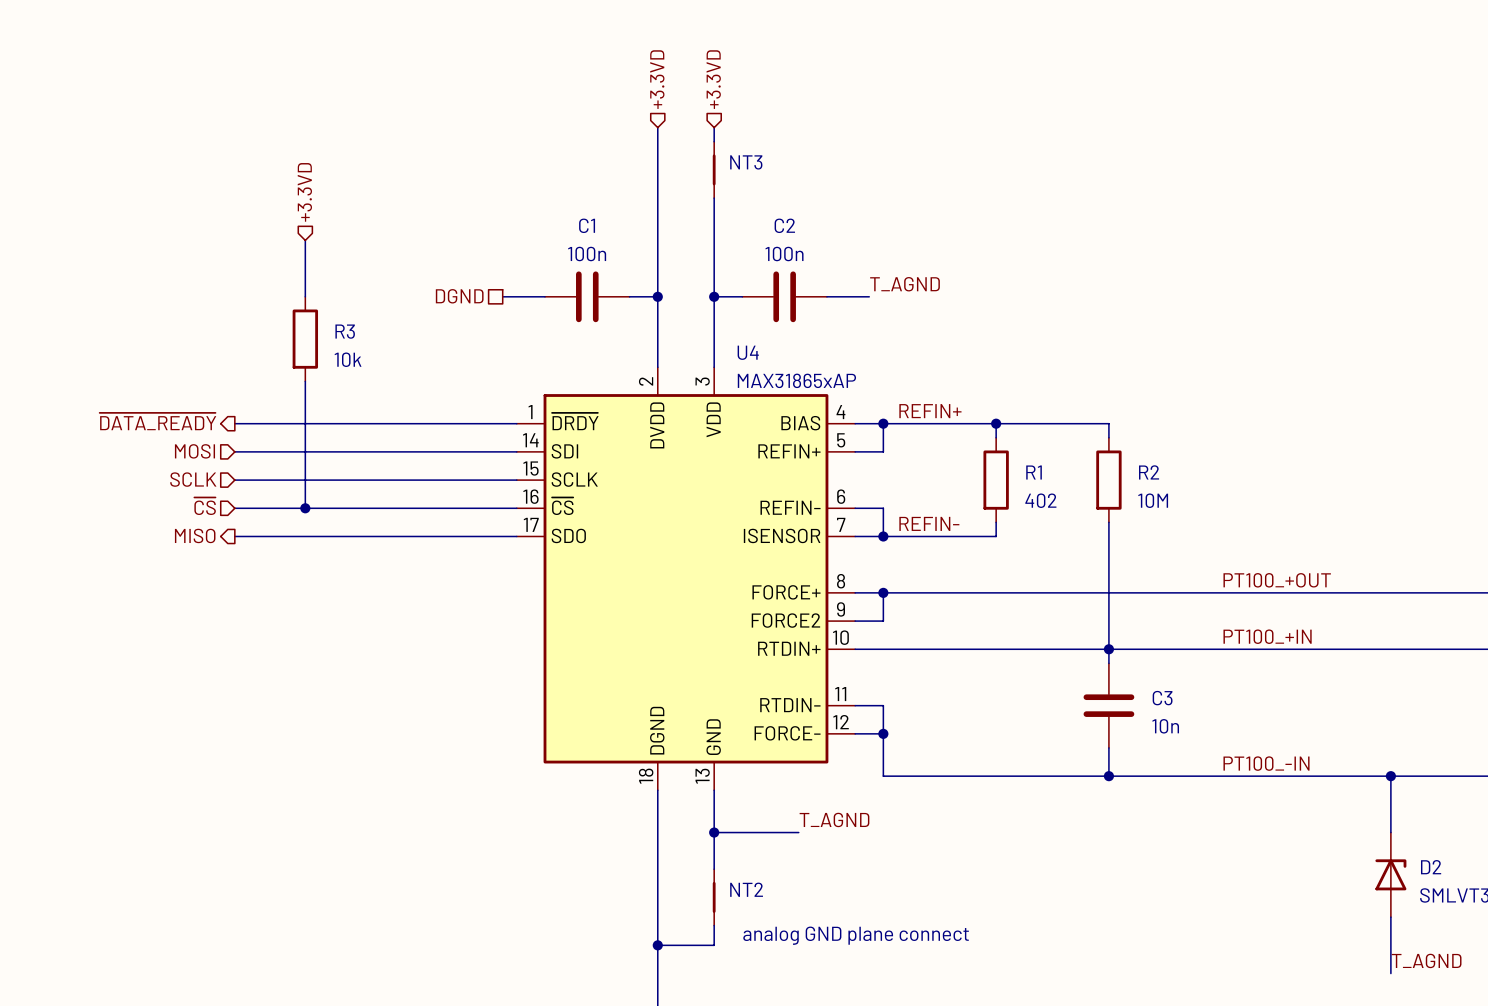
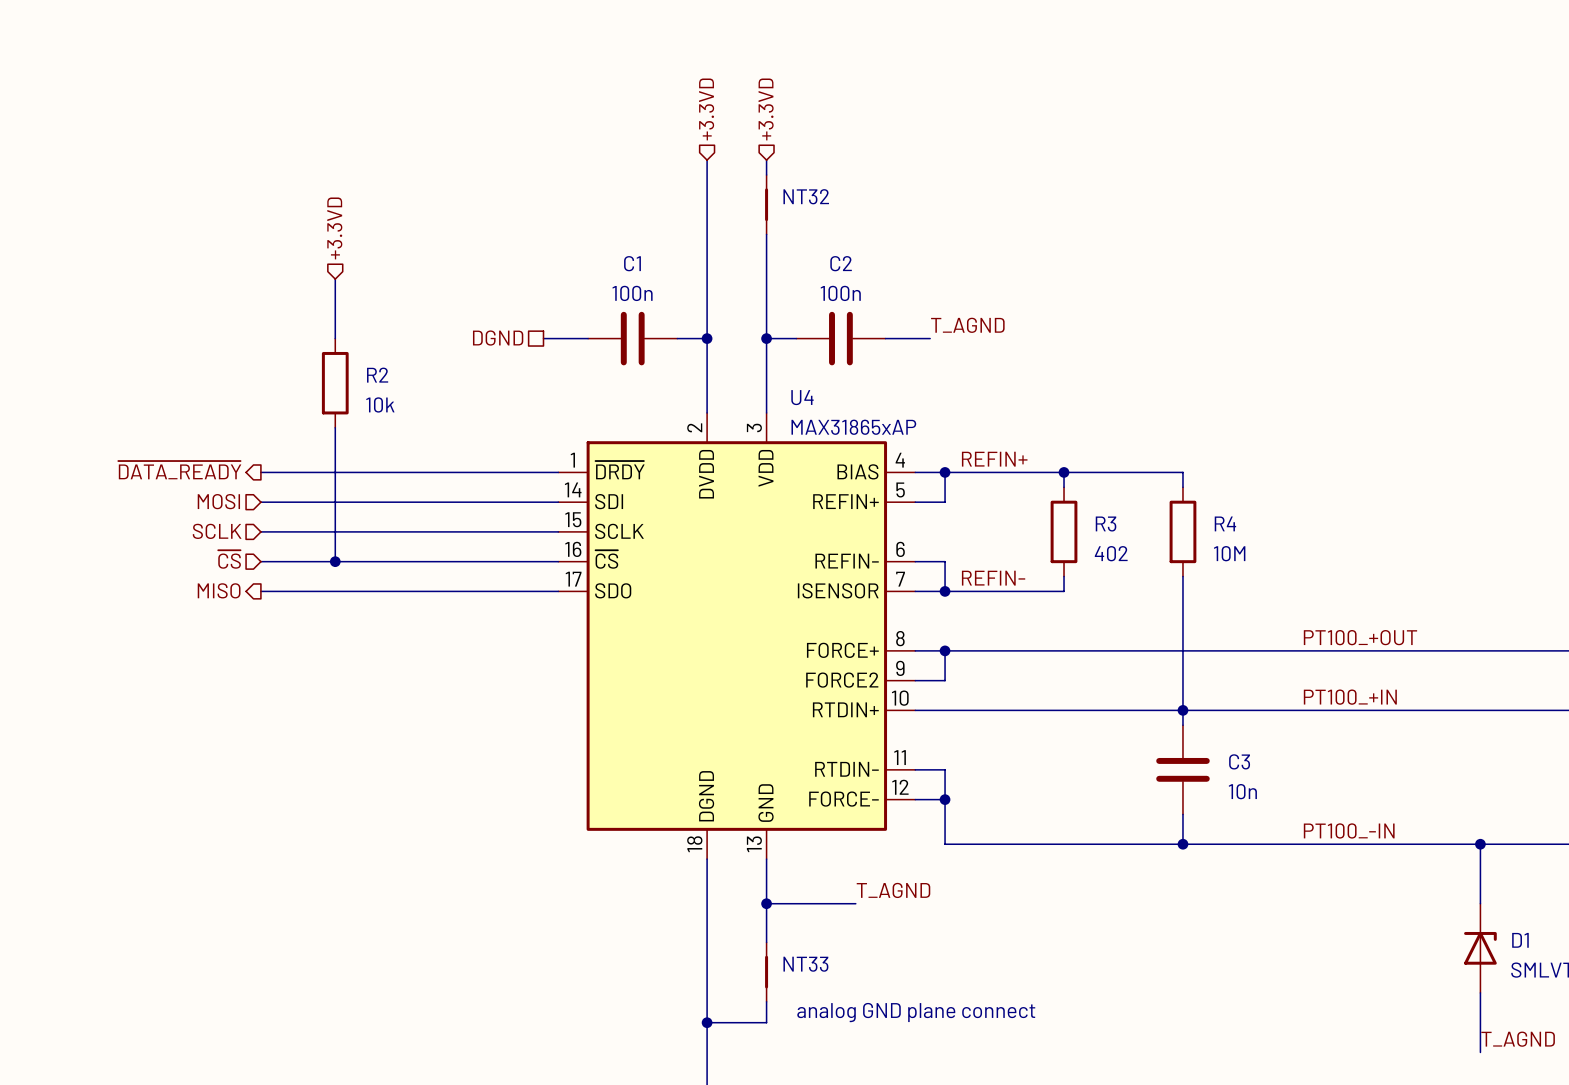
NT3 name: NT3 (746, 162) -> NT32 (806, 196)
R3 name: R3 (345, 331) -> R2 (377, 375)
R1 name: R1 (1034, 472) -> R3 (1106, 524)
R2 name: R2 (1149, 472) -> R4 (1225, 523)
D2 name: D2 (1431, 867) -> D1 (1520, 940)
NT2 name: NT2 (746, 889) -> NT33 (805, 964)

